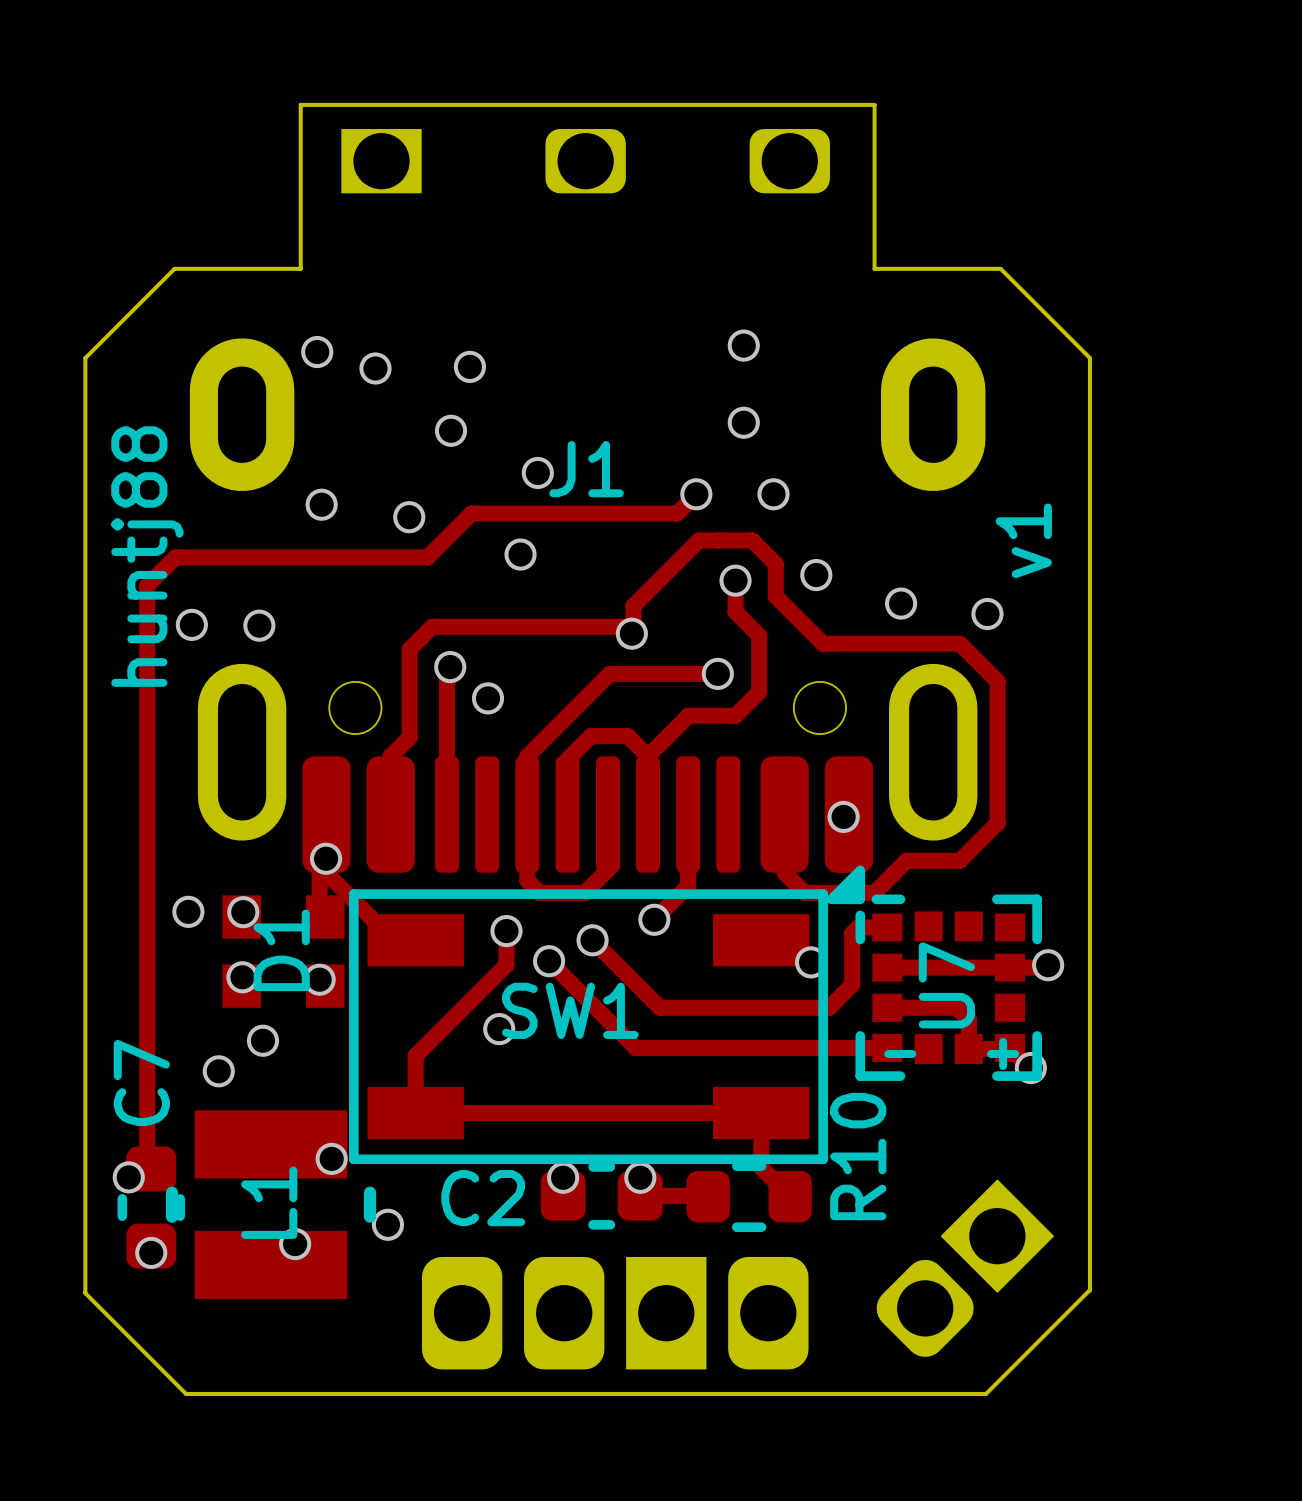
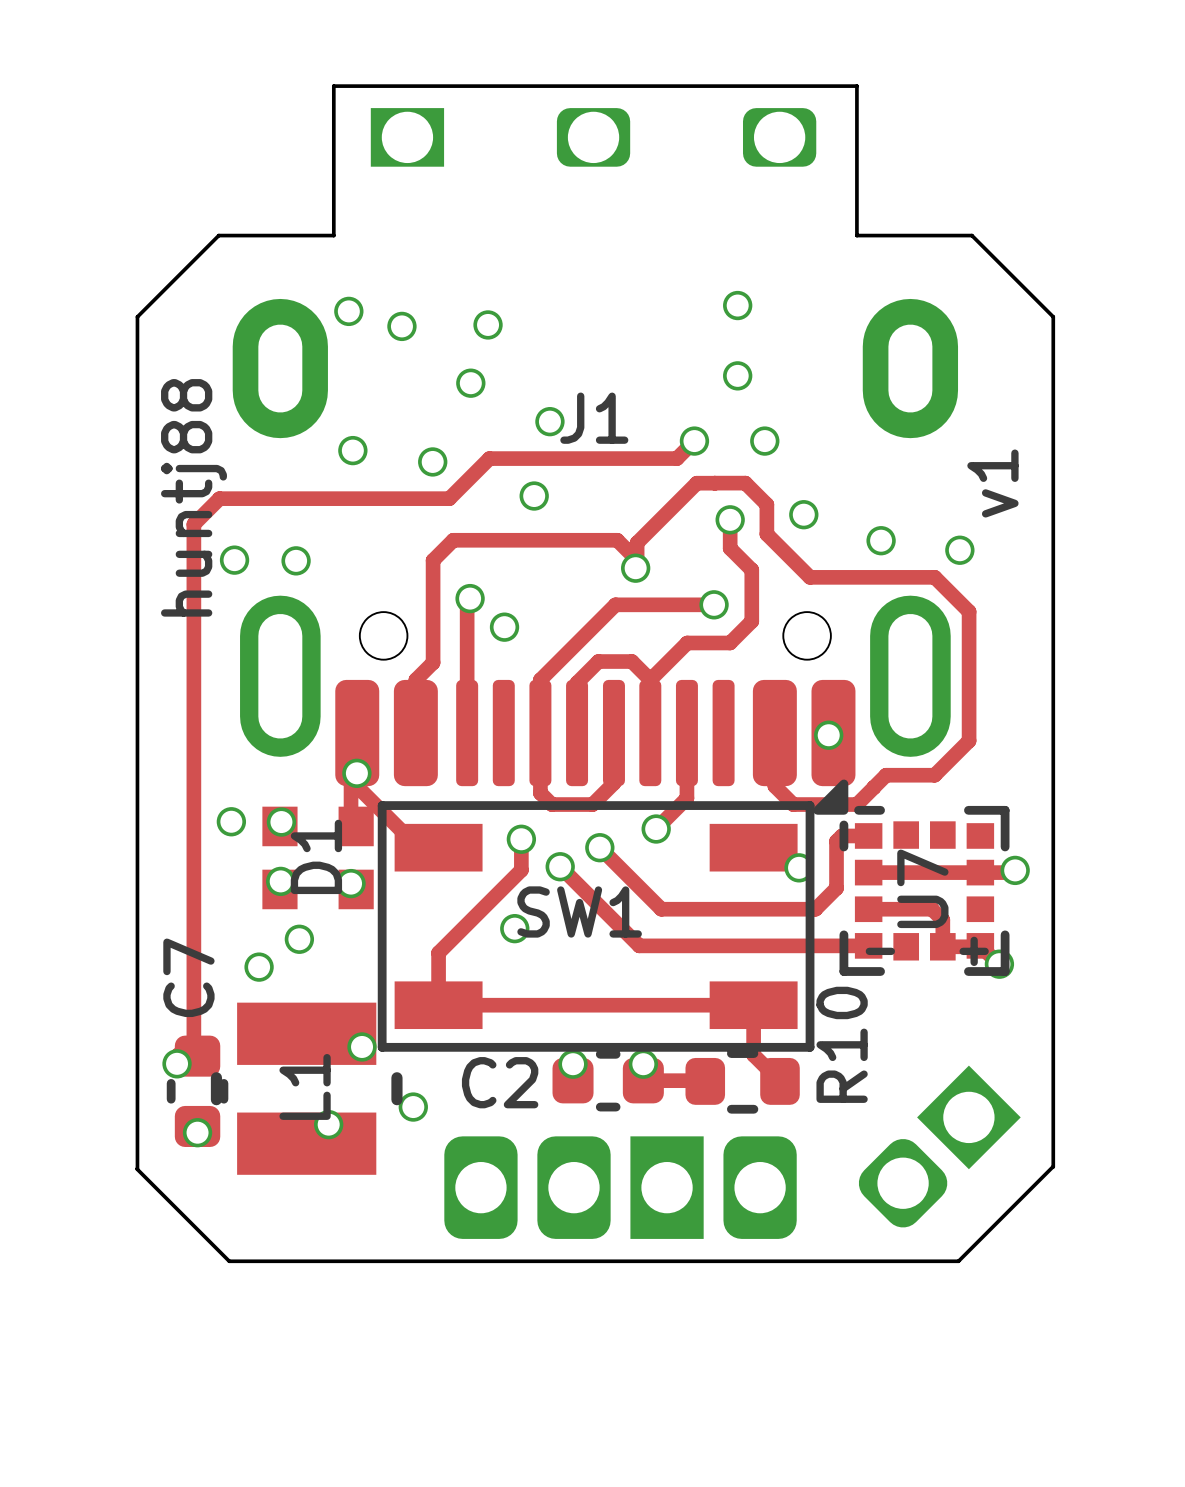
track: (631, 624) (631, 633) (624, 626) (432, 626) (409, 649) -> (636, 559) (617, 540) (453, 540) (433, 560) (433, 582)

